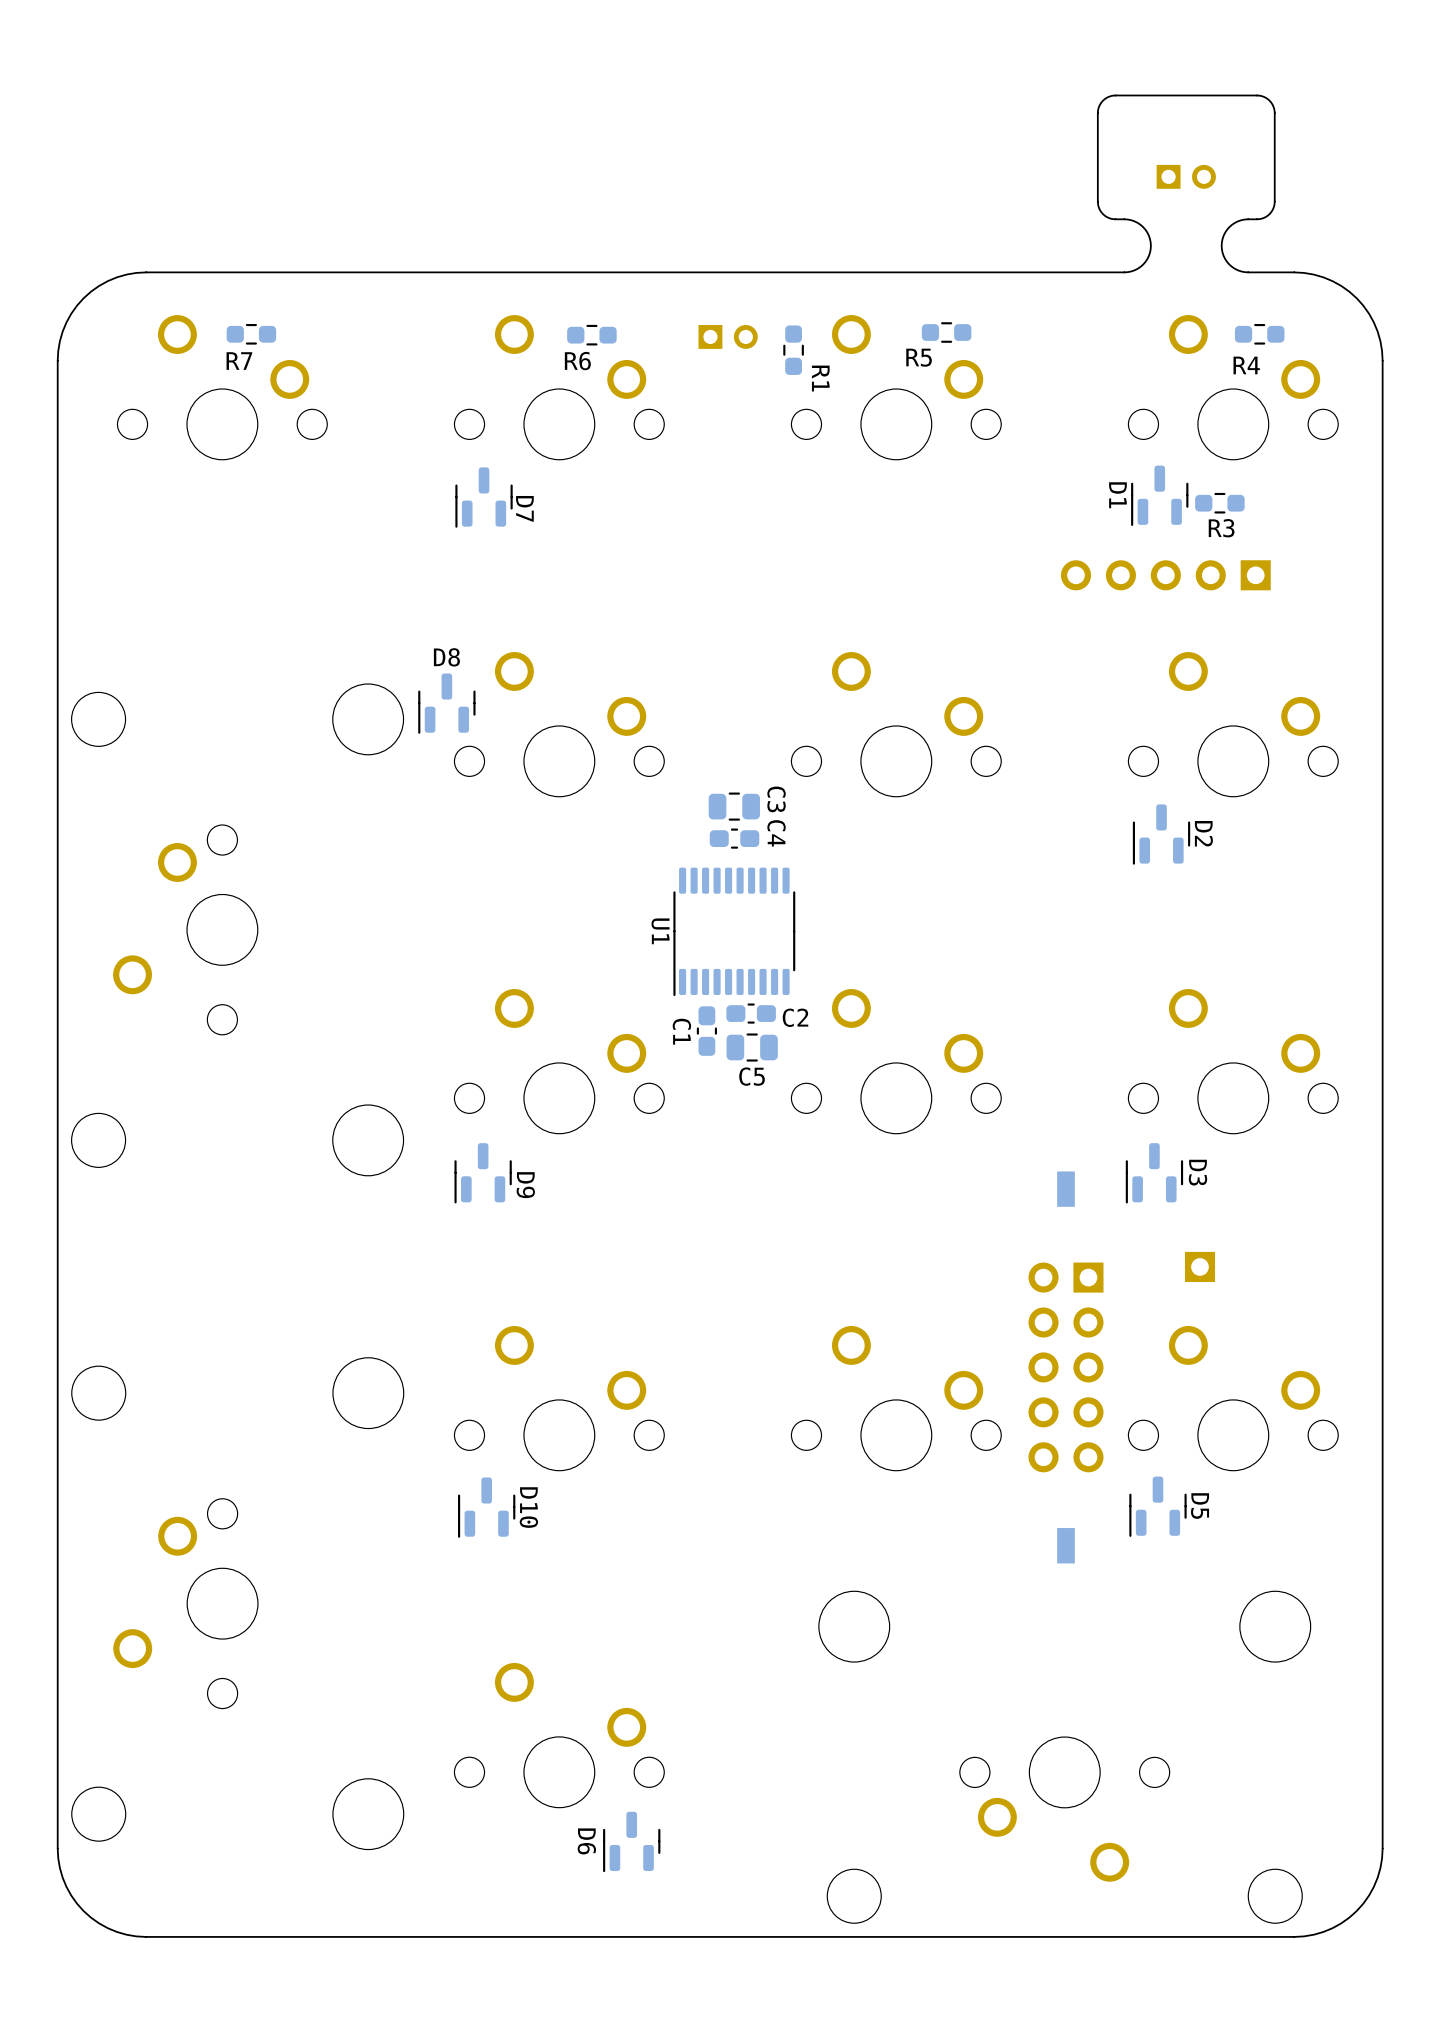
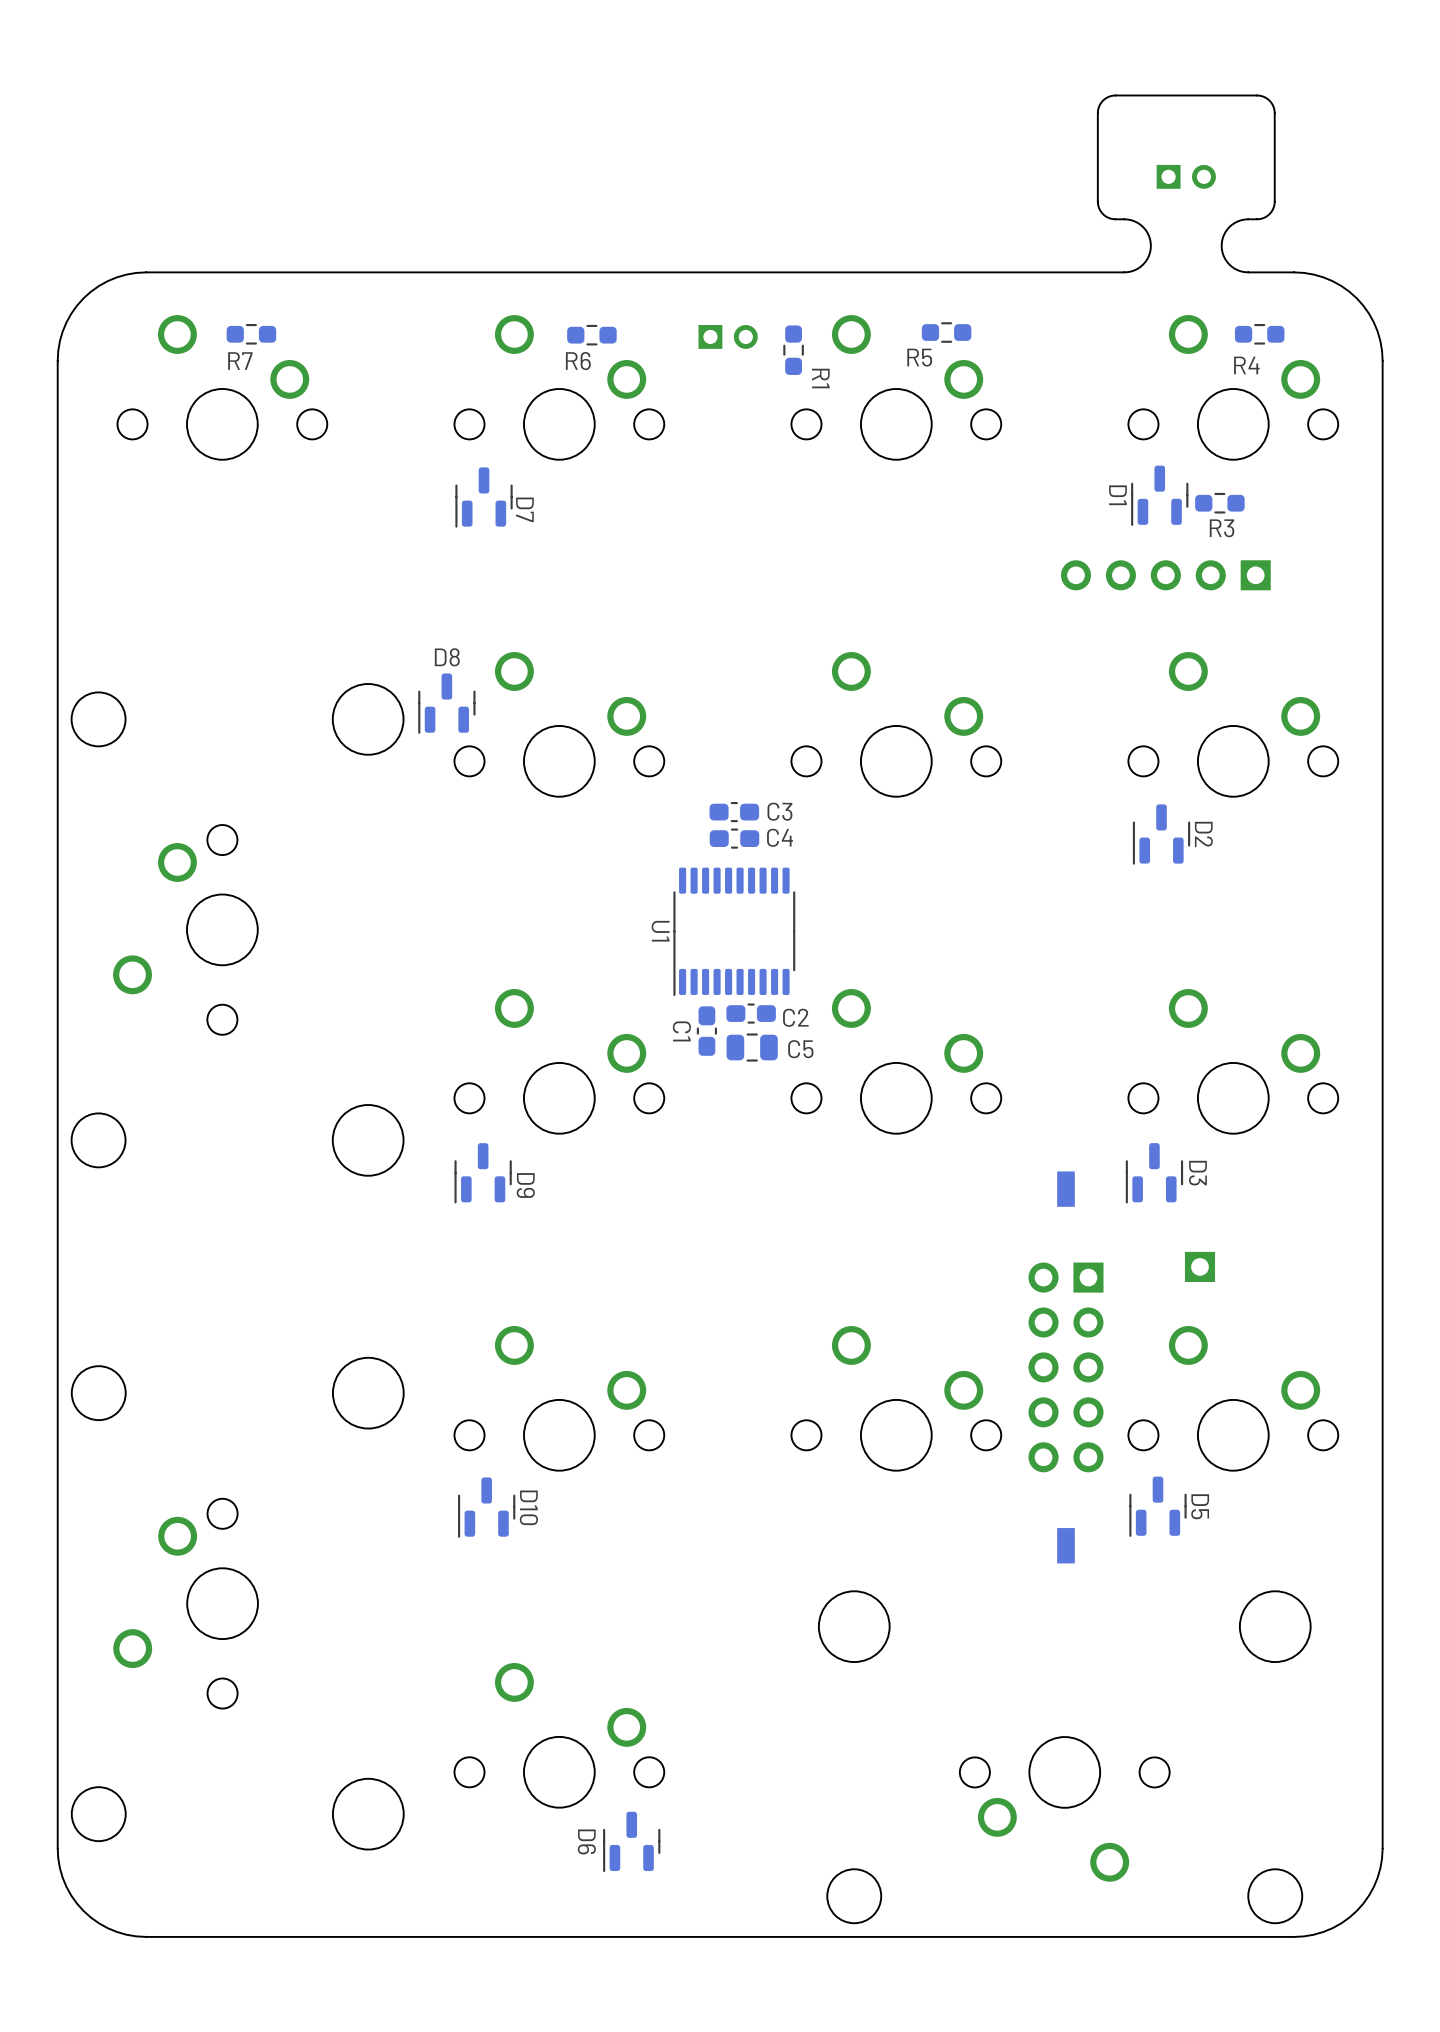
C3 footprint: [708, 792, 760, 821] -> [709, 801, 760, 823]
C3 name rotation: 0° (776, 799) -> 90° counterclockwise (779, 811)
C4 name rotation: 0° (776, 833) -> 90° counterclockwise (780, 837)
C5 name position: C5 (752, 1076) -> C5 (800, 1049)

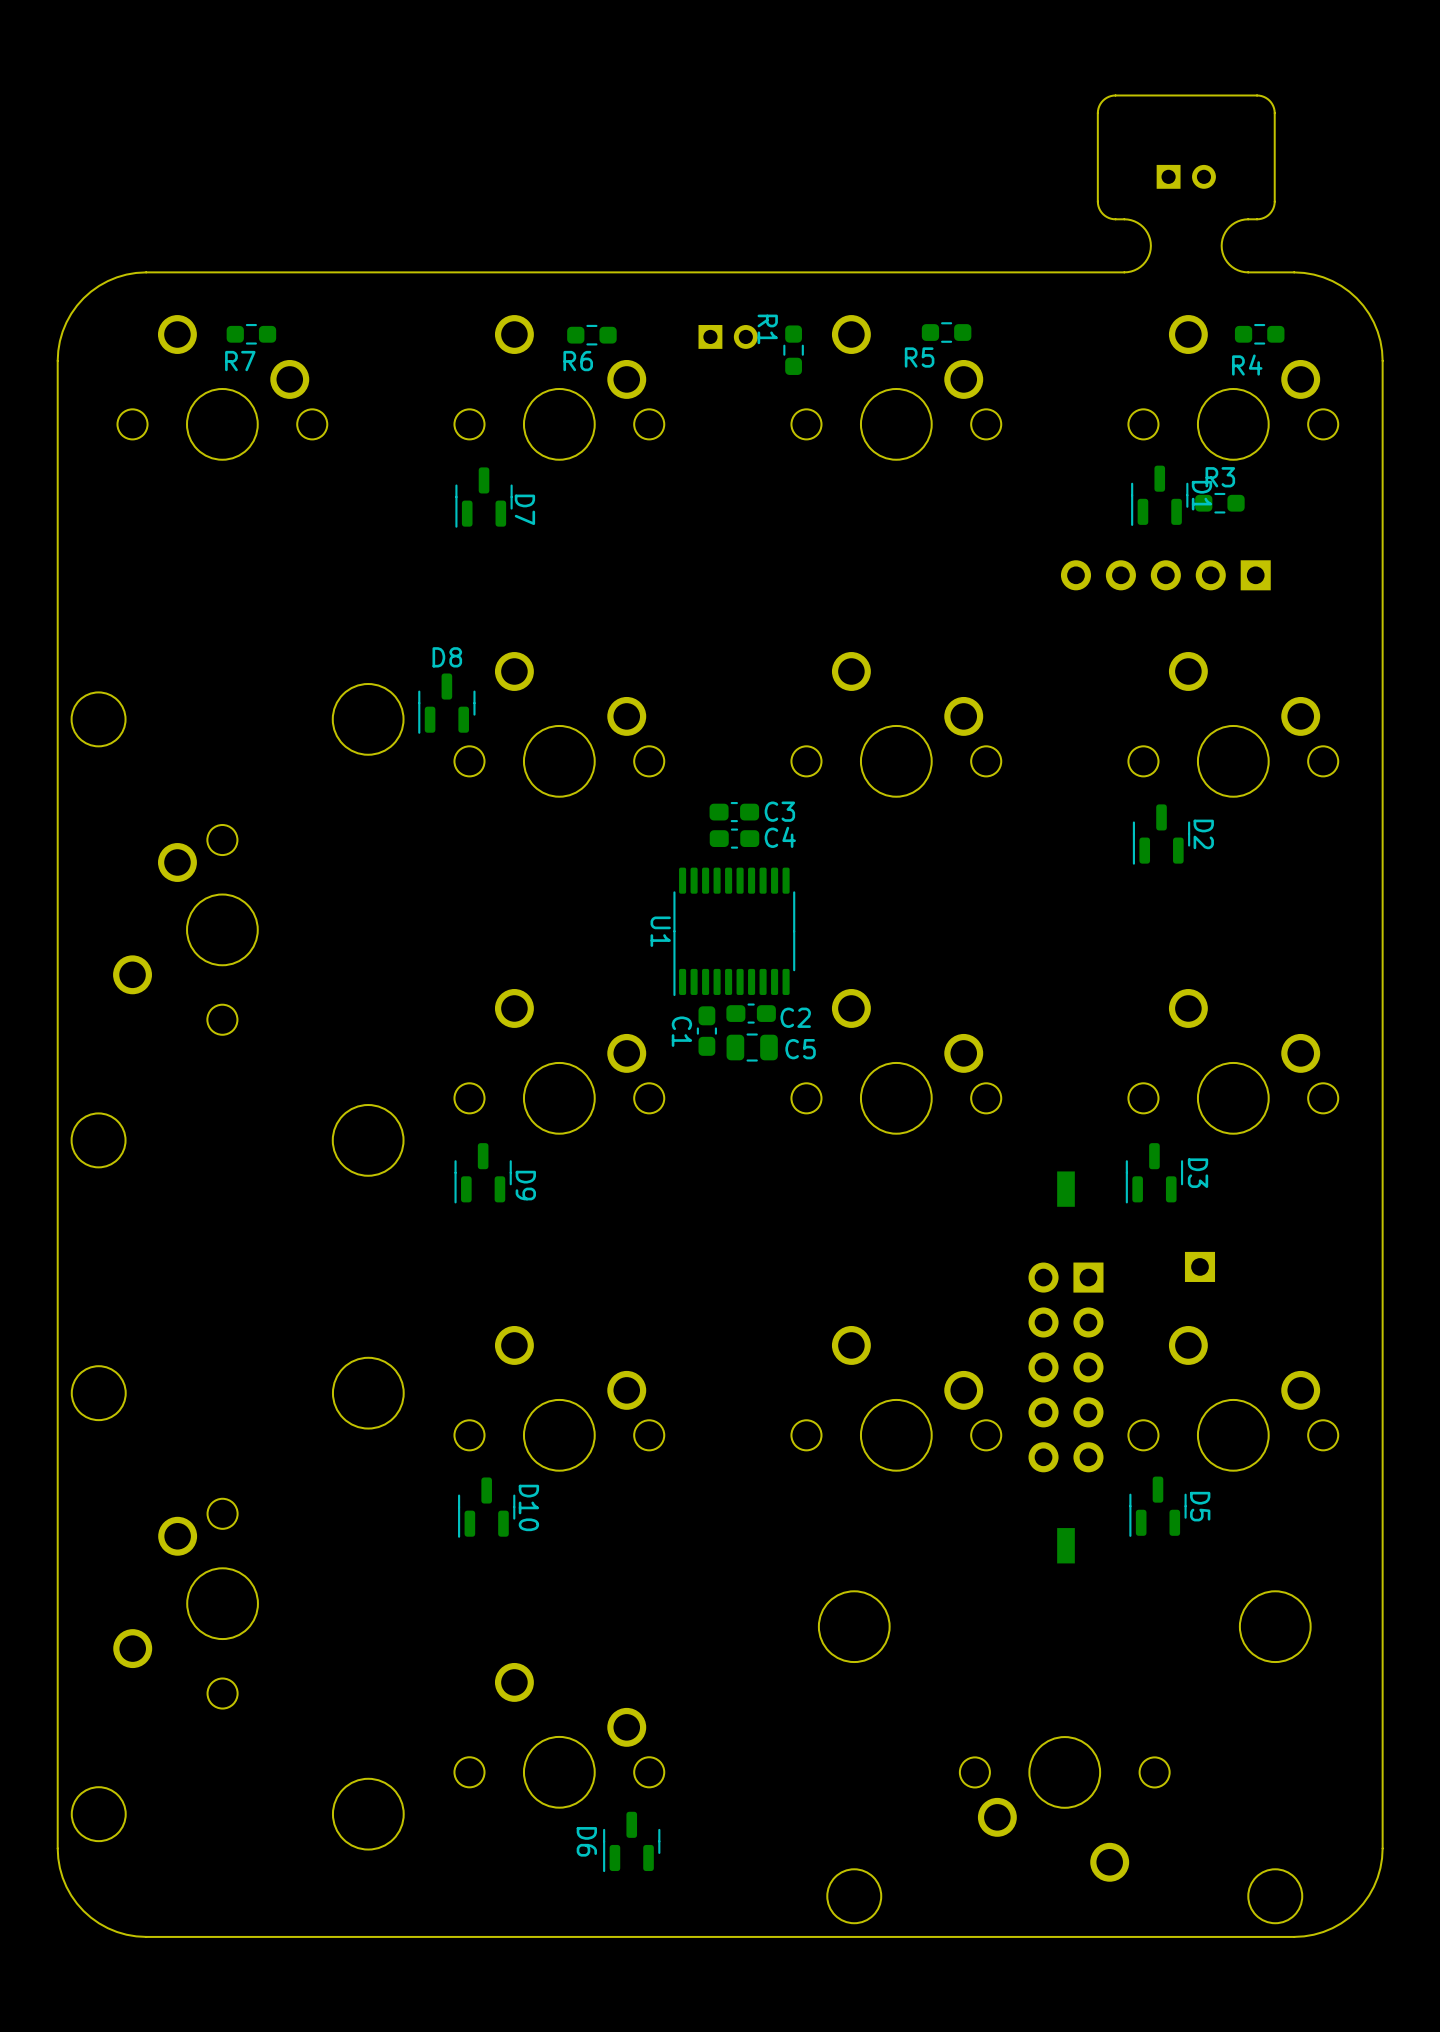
R1 name position: R1 (820, 378) -> R1 (767, 329)
D1 name position: D1 (1117, 495) -> D1 (1201, 495)
R3 name position: R3 (1222, 528) -> R3 (1220, 477)

